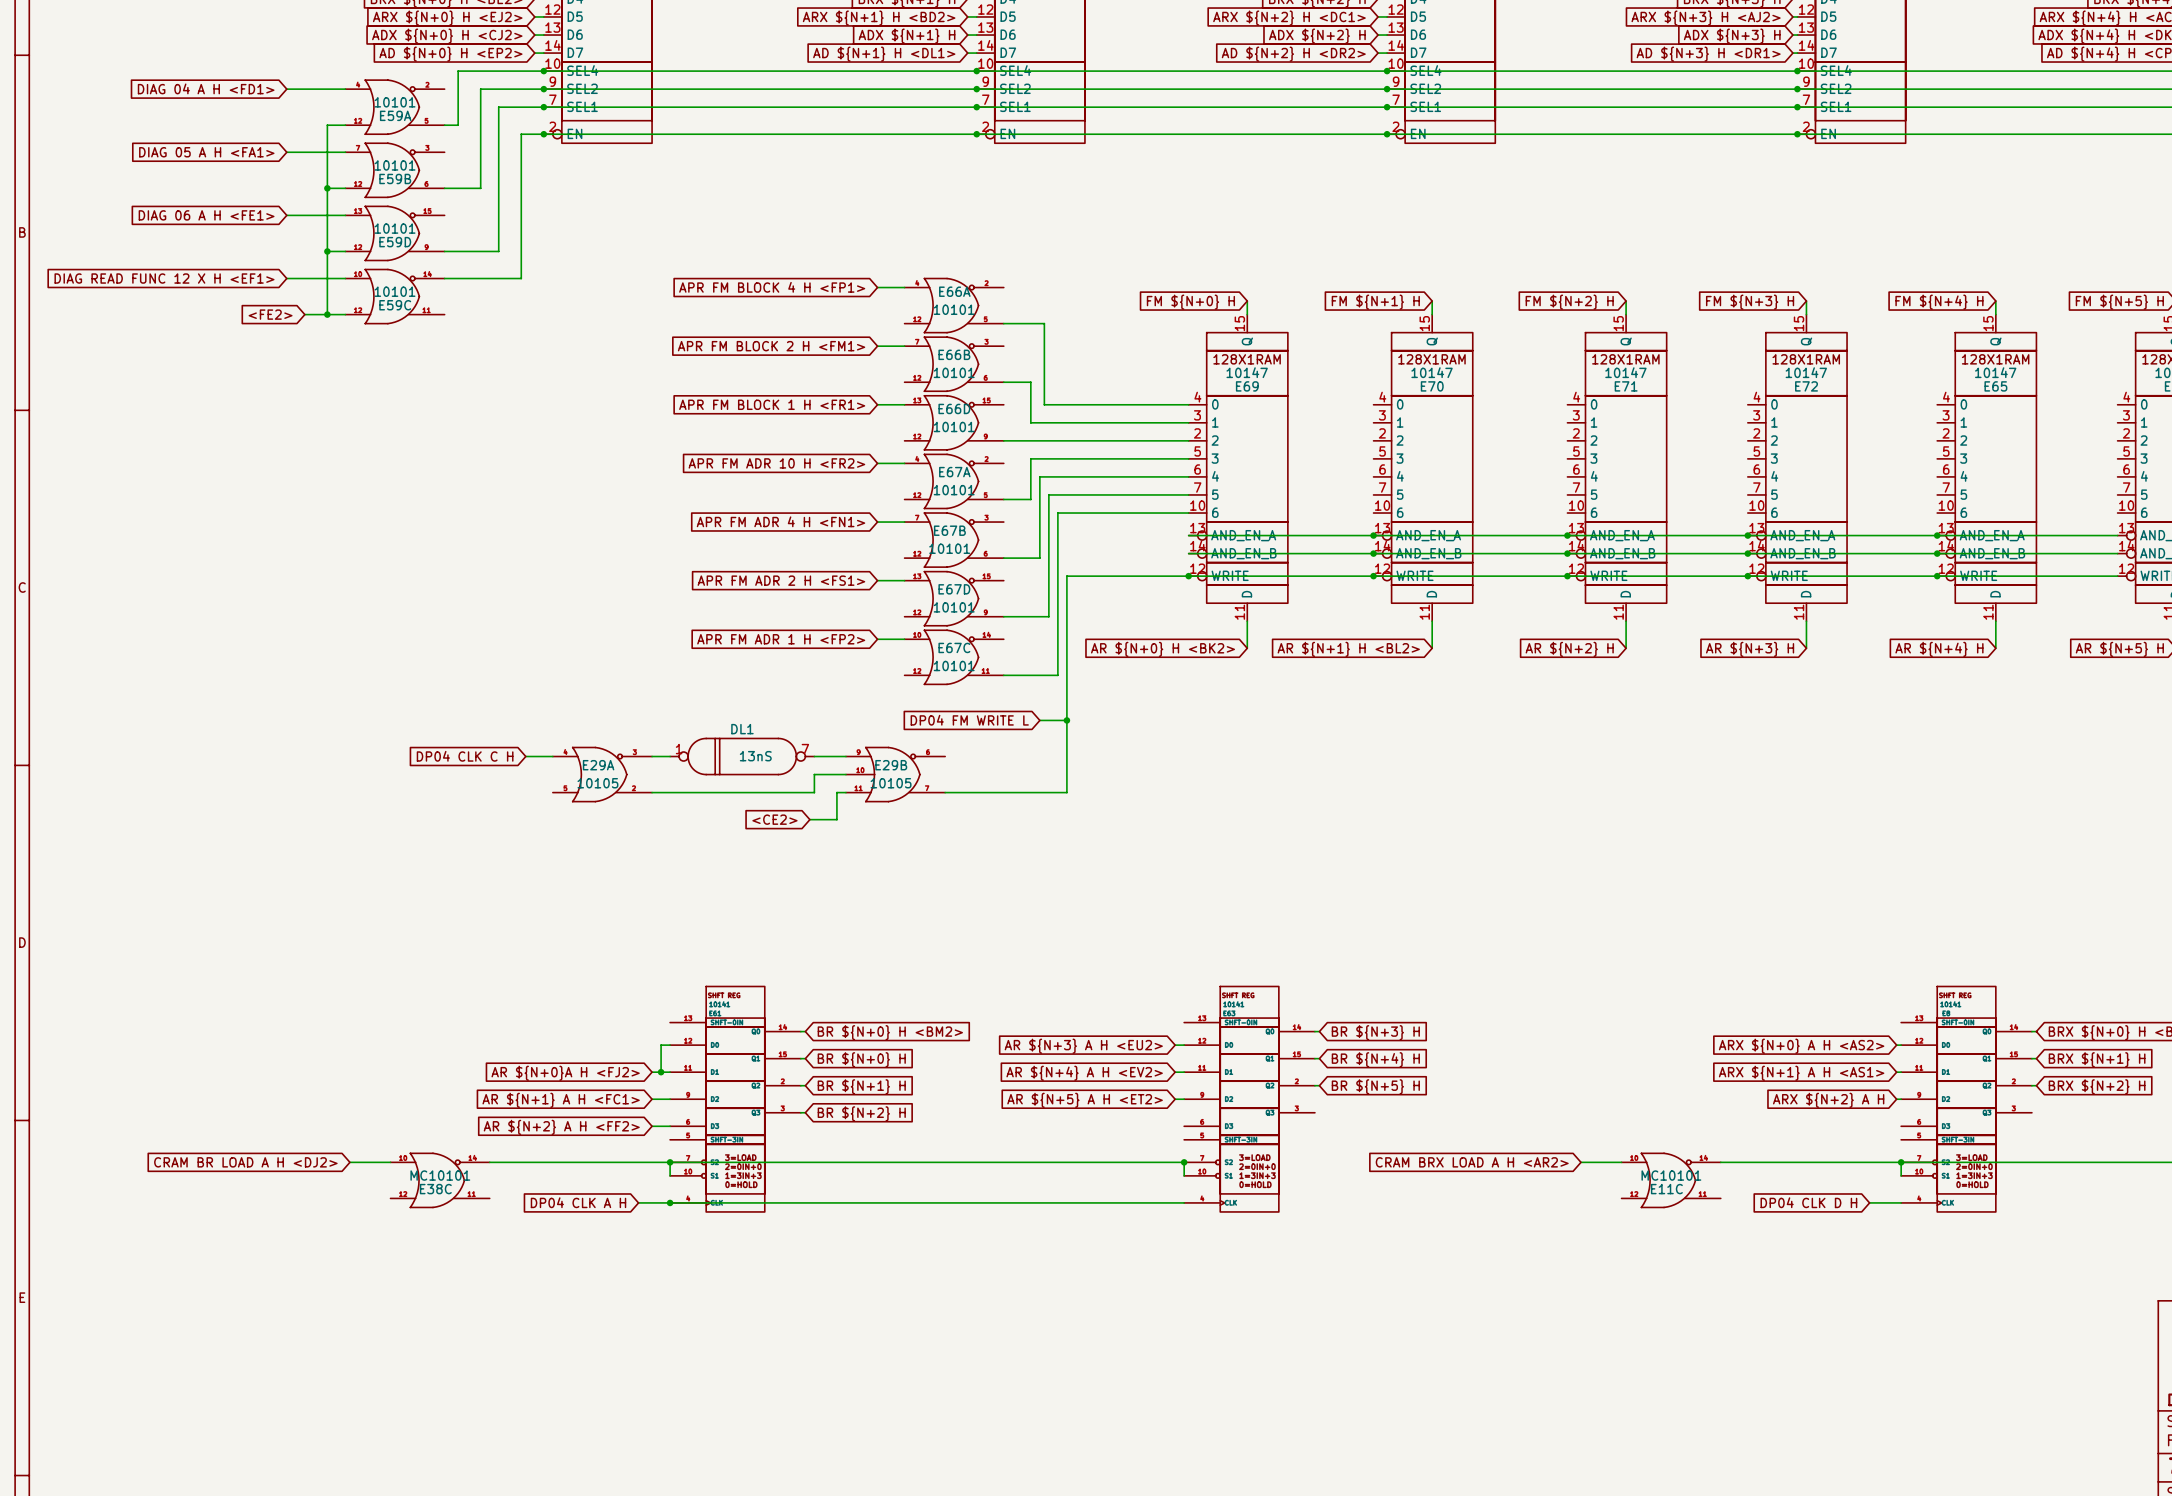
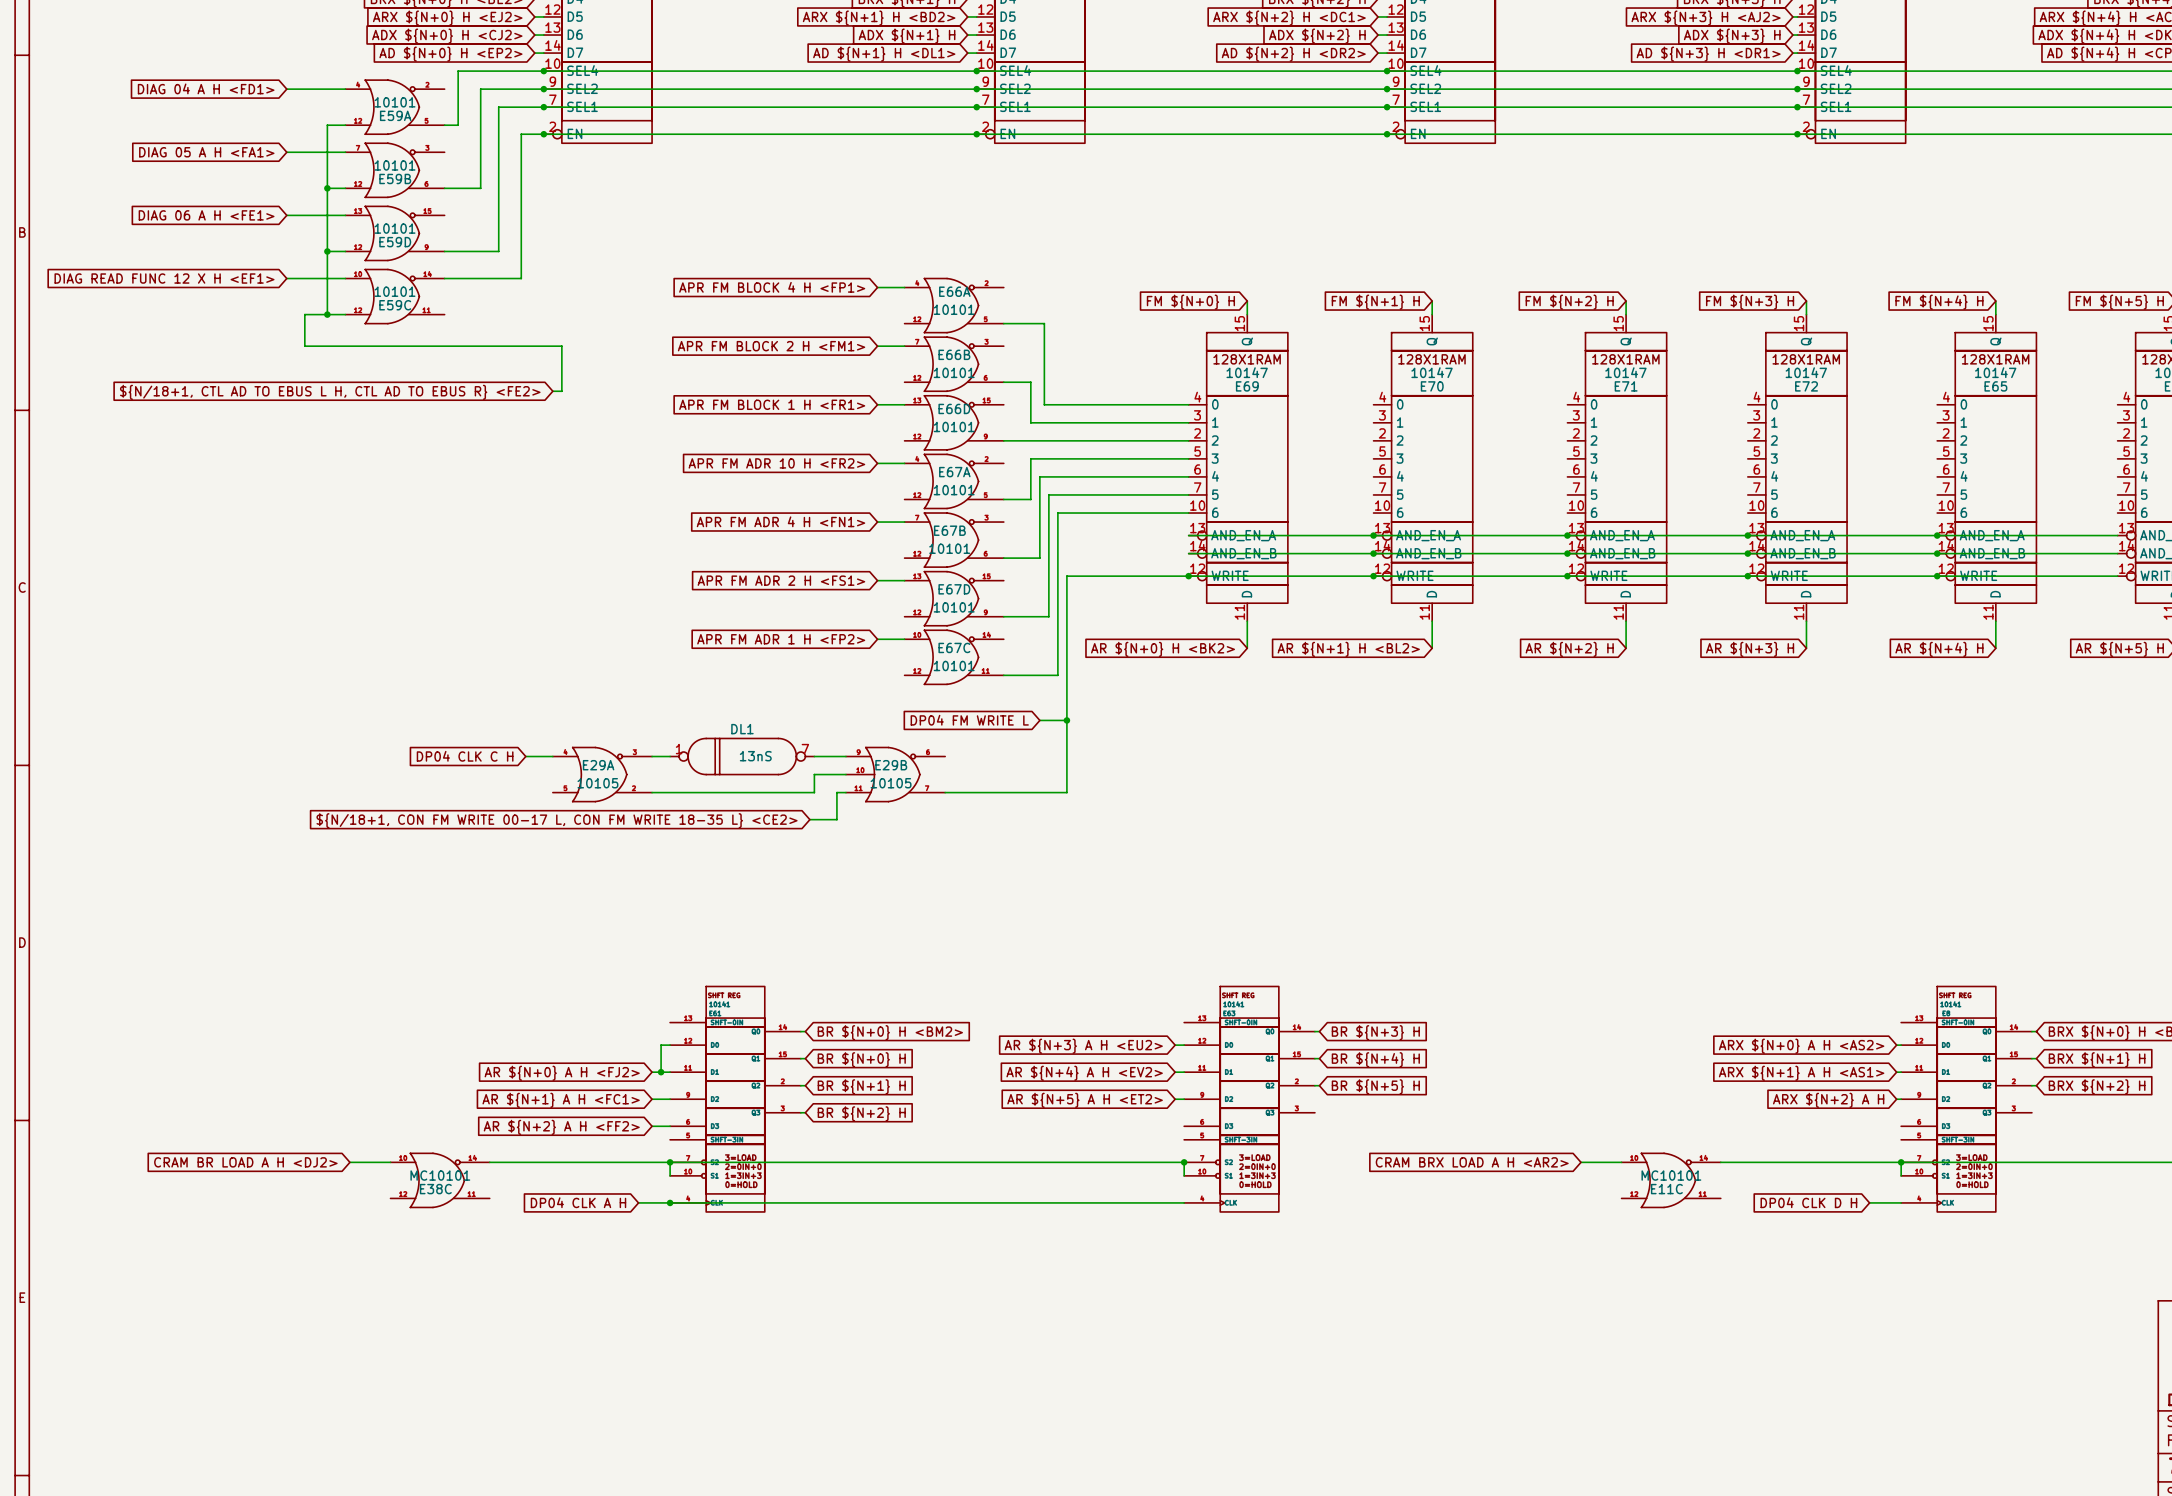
global label: <FE2> (270, 314) -> none
wire: none -> (304, 314) (304, 346) (561, 346) (561, 391) (552, 391)
global label: none -> ${N/18+1, CTL AD TO EBUS L H, CTL AD TO EBUS R} <FE2> (330, 392)
global label: <CE2> (774, 819) -> ${N/18+1, CON FM WRITE 00-17 L, CON FM WRITE 18-35 L} <CE2> (557, 820)
global label: AR ${N+0}A H <FJ2> (565, 1073) -> AR ${N+0} A H <FJ2> (562, 1073)

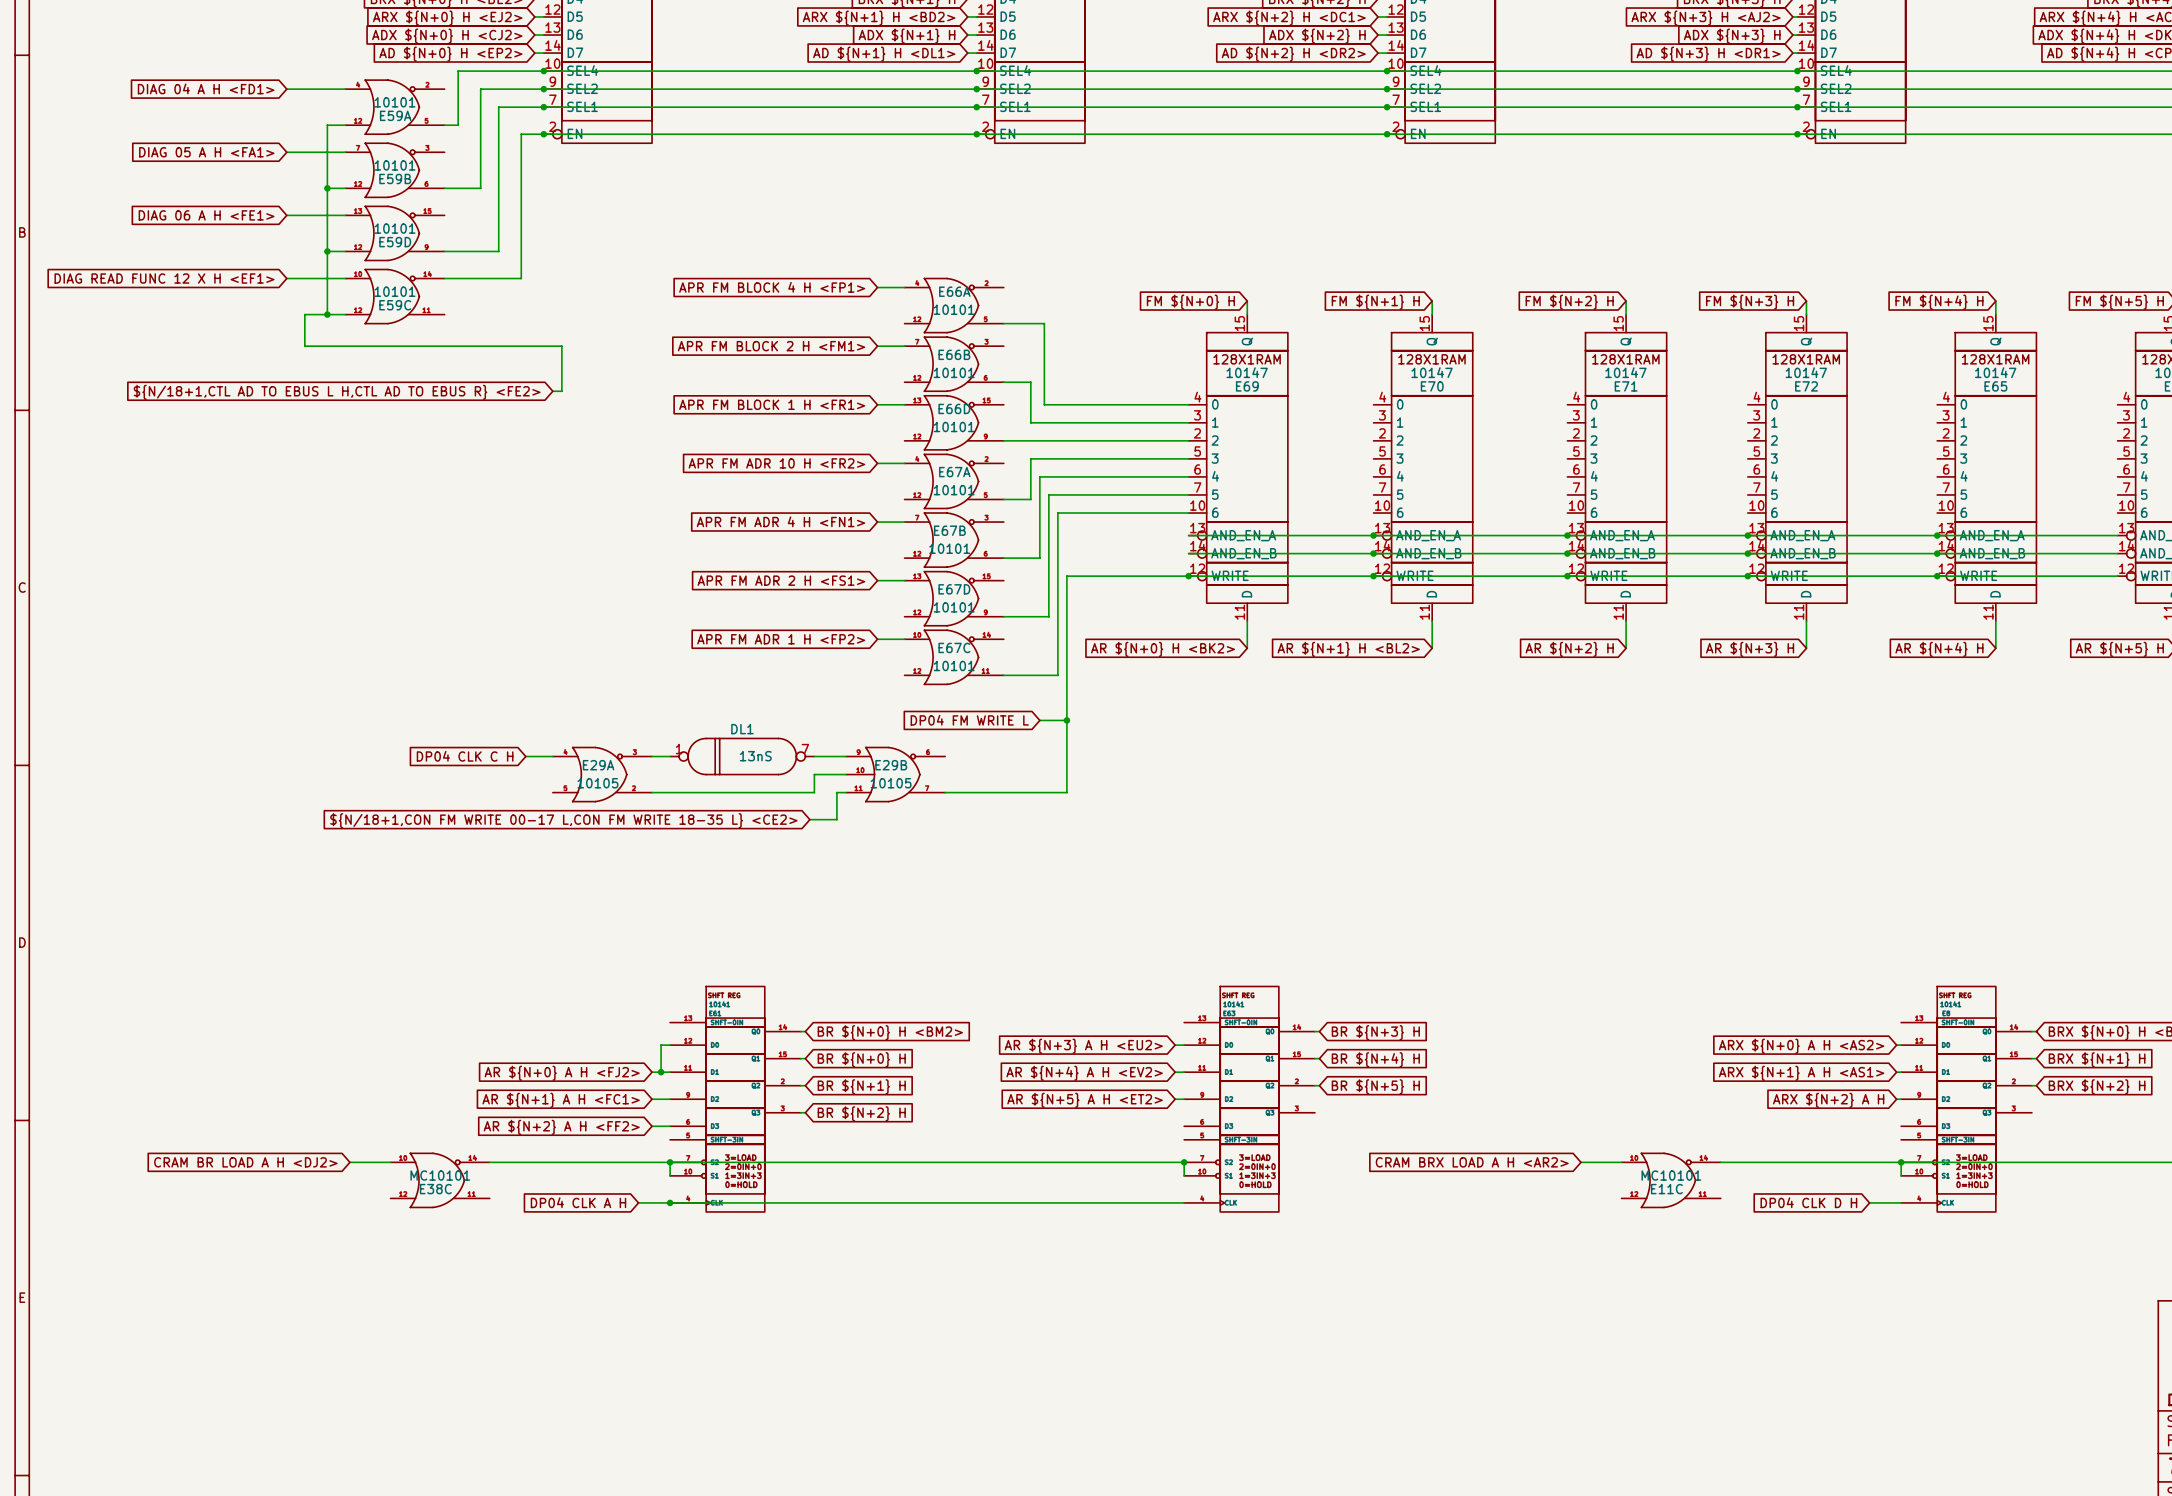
global label: ${N/18+1, CTL AD TO EBUS L H, CTL AD TO EBUS R} <FE2> (330, 392) -> ${N/18+1,CTL AD TO EBUS L H,CTL AD TO EBUS R} <FE2> (337, 392)
global label: ${N/18+1, CON FM WRITE 00-17 L, CON FM WRITE 18-35 L} <CE2> (557, 820) -> ${N/18+1,CON FM WRITE 00-17 L,CON FM WRITE 18-35 L} <CE2> (563, 820)

